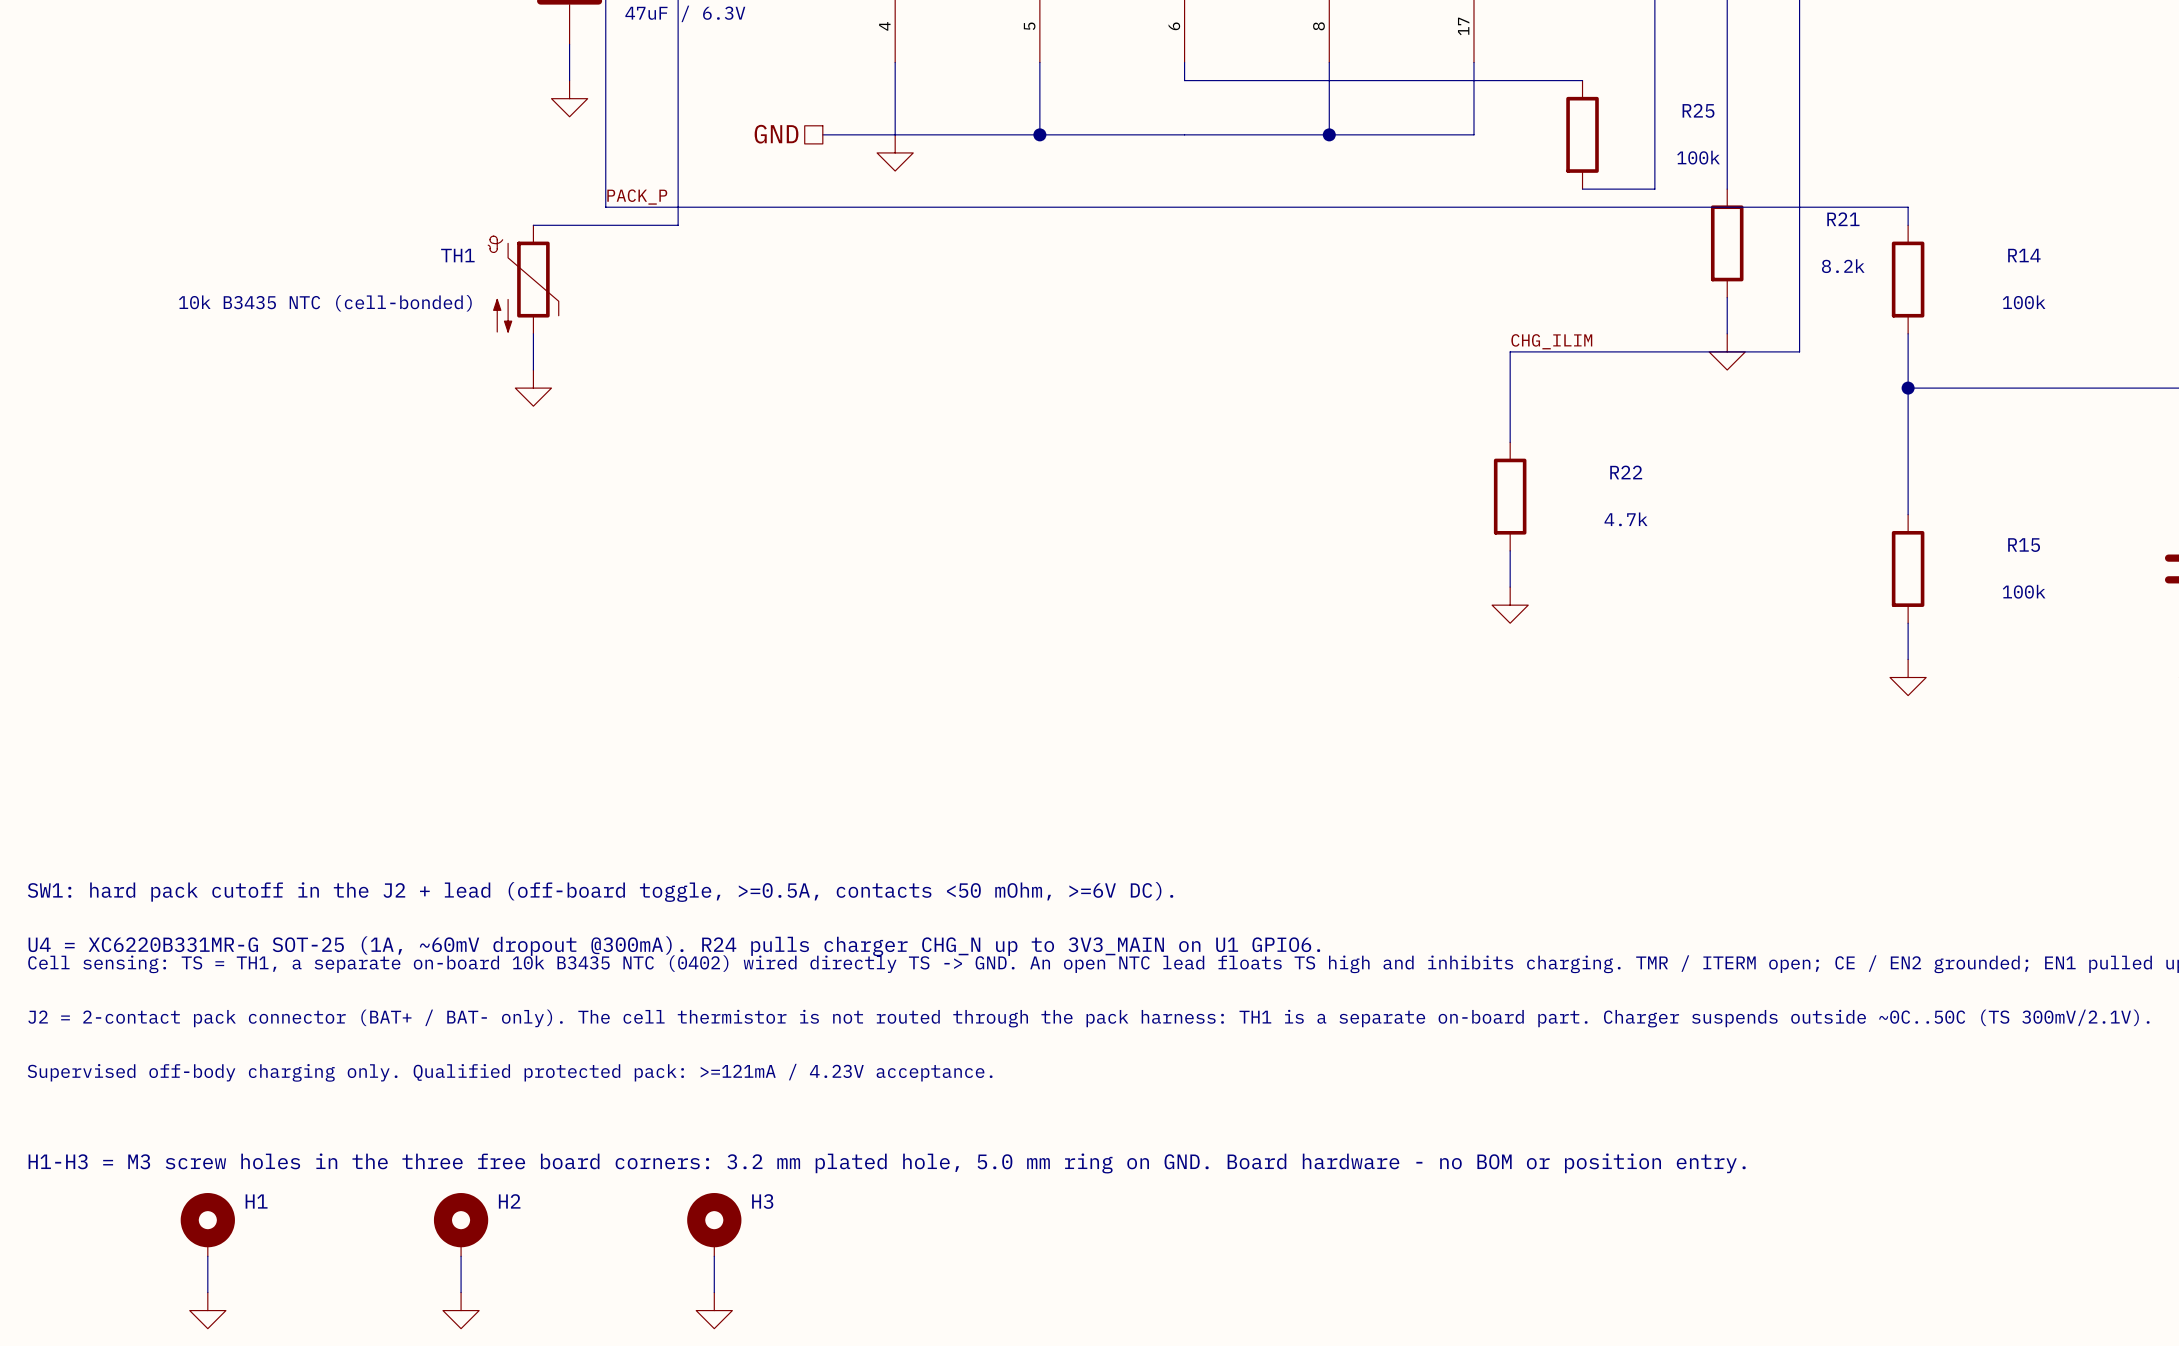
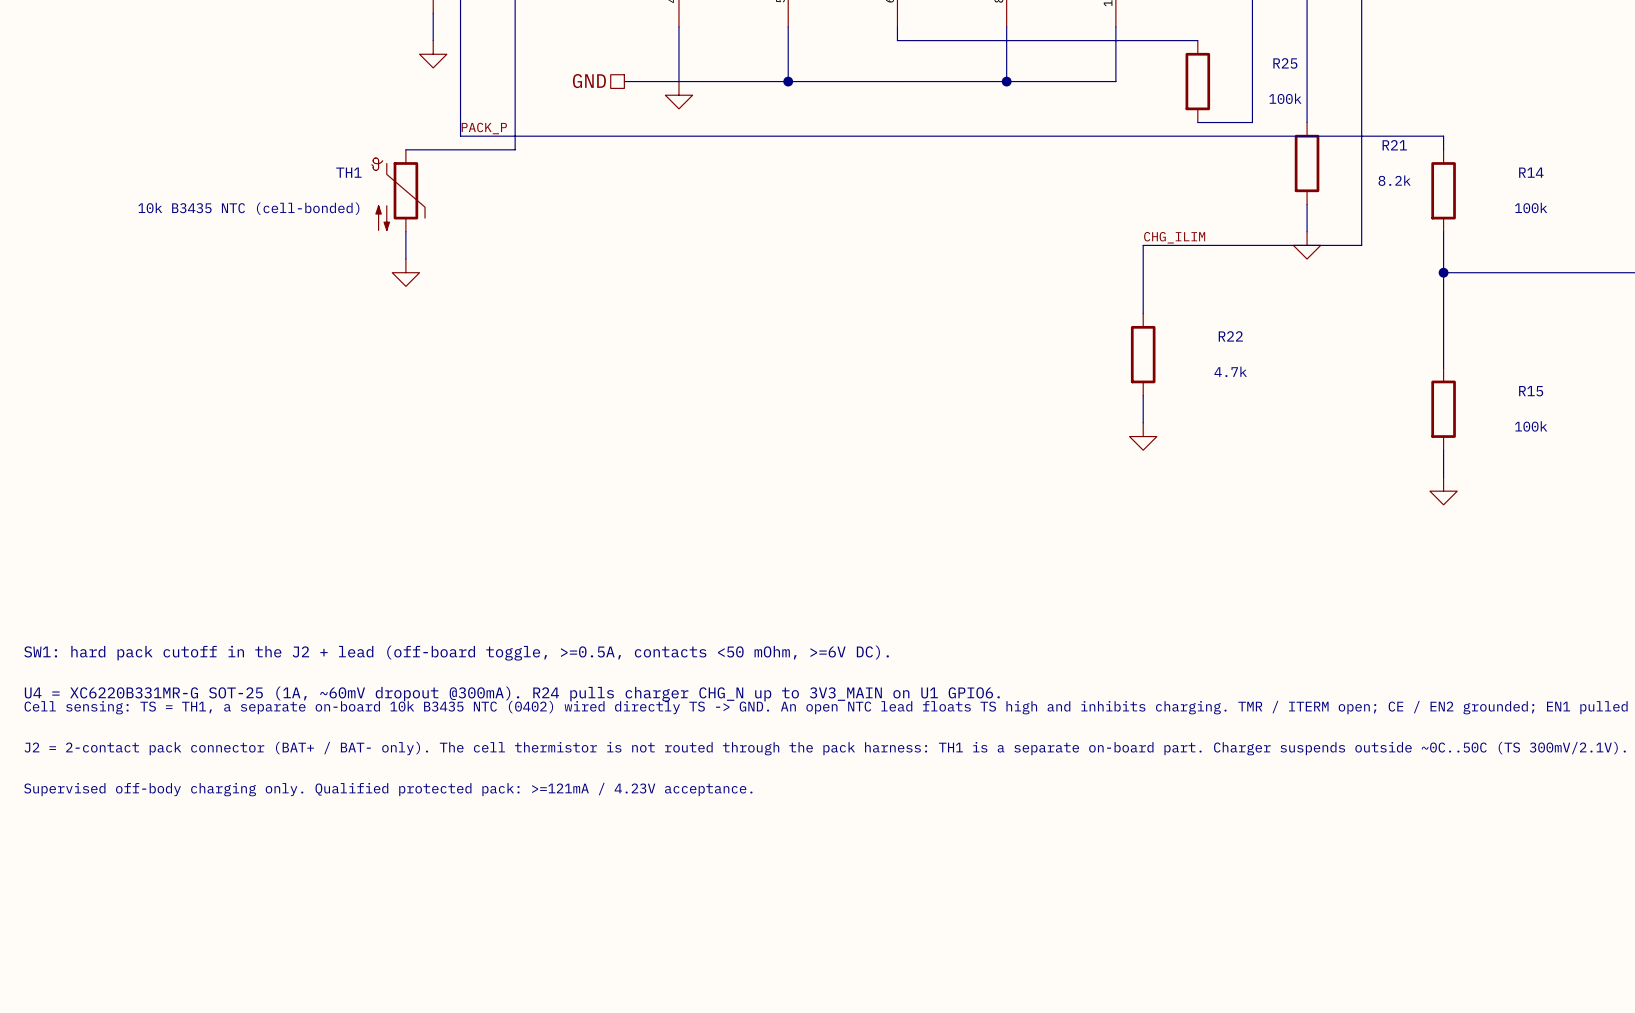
text: H1-H3 = M3 screw holes in the three free board corners: 3.2 mm plated hole, 5.0 mm ring on GND. Board hardware - no BOM or position entry. (887, 1163) -> none
H1: (207, 1224) -> none
H2: (461, 1224) -> none
H3: (714, 1224) -> none
wire: (207, 1256) (207, 1292) -> none
wire: (461, 1256) (461, 1292) -> none
wire: (714, 1256) (714, 1292) -> none
power symbol: (207, 1310) -> none
power symbol: (461, 1310) -> none
power symbol: (714, 1310) -> none

